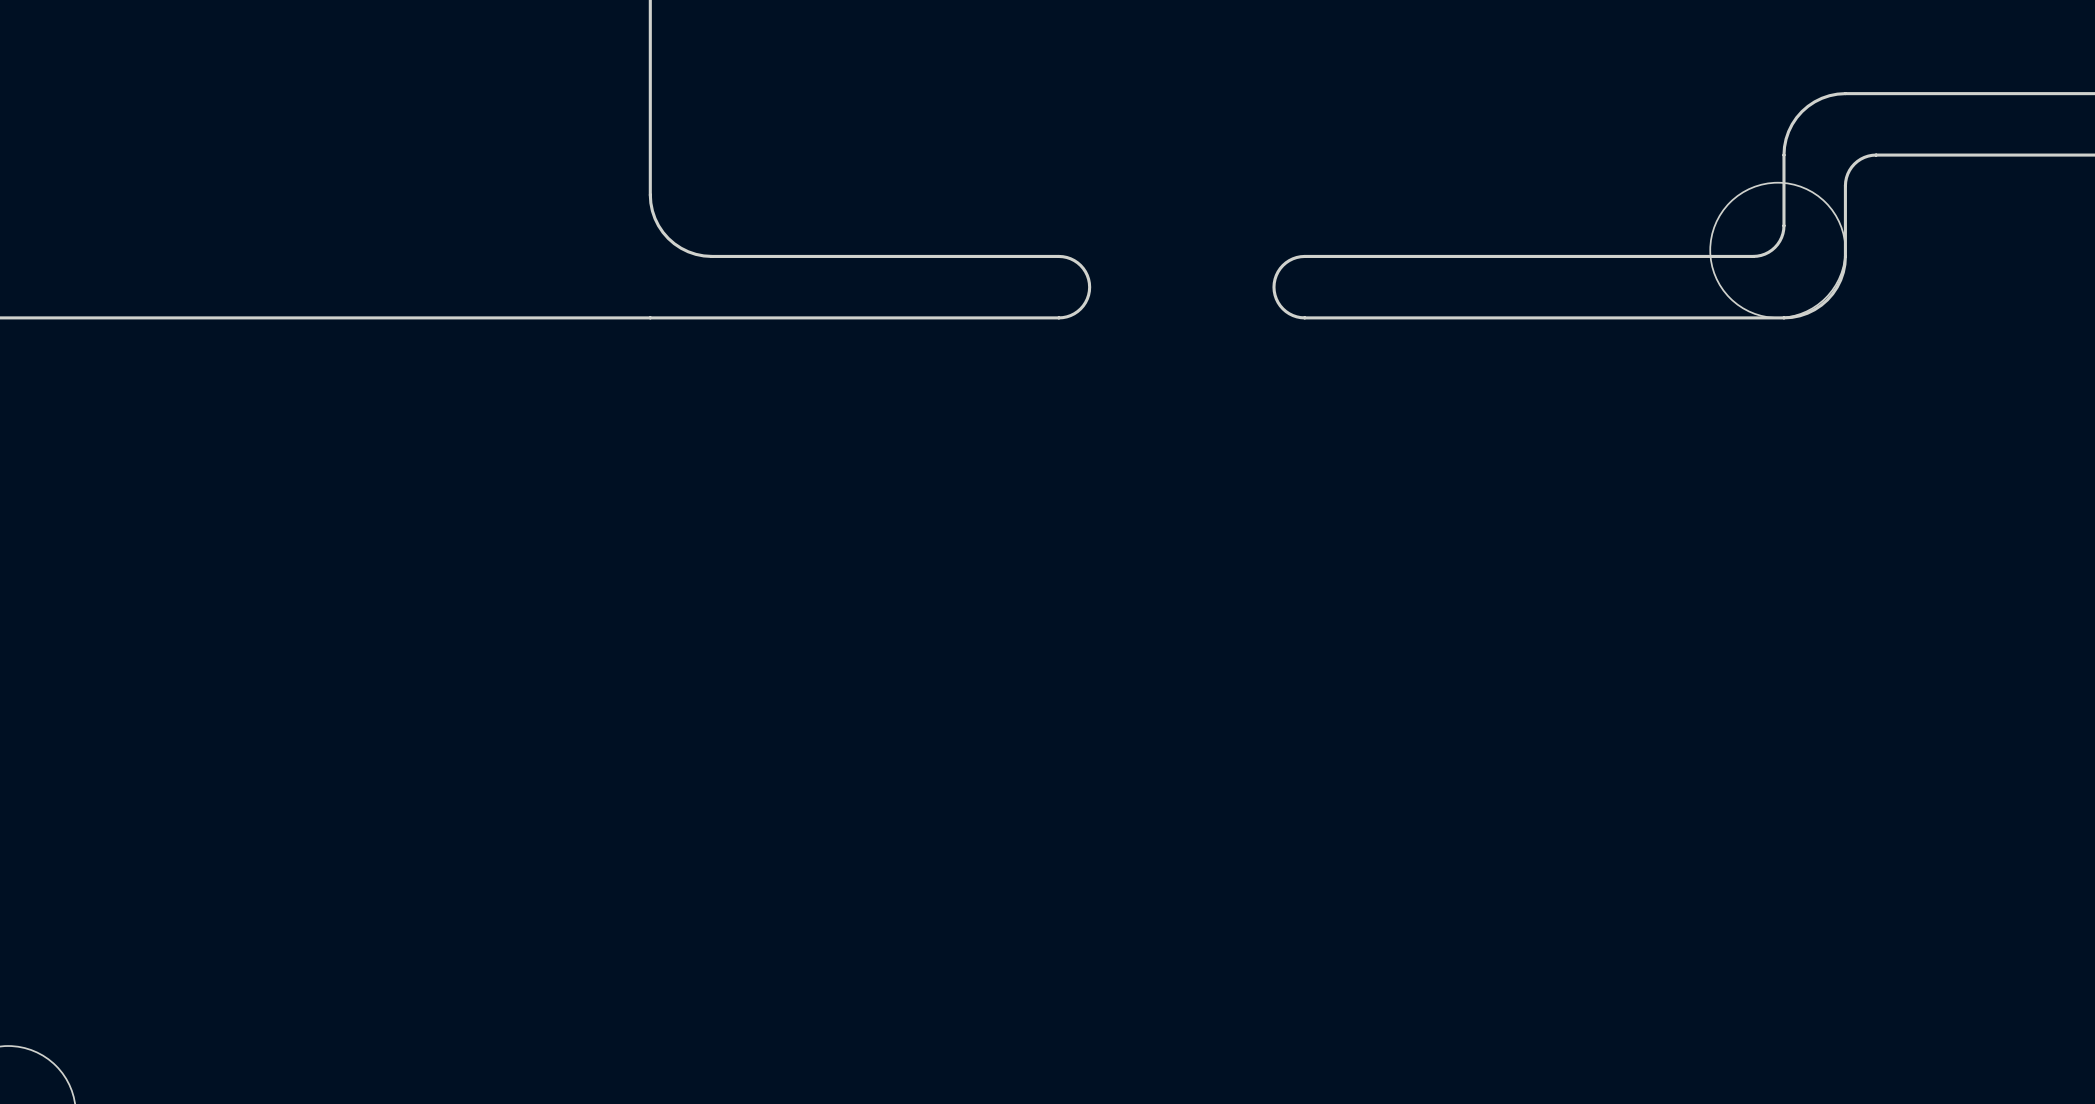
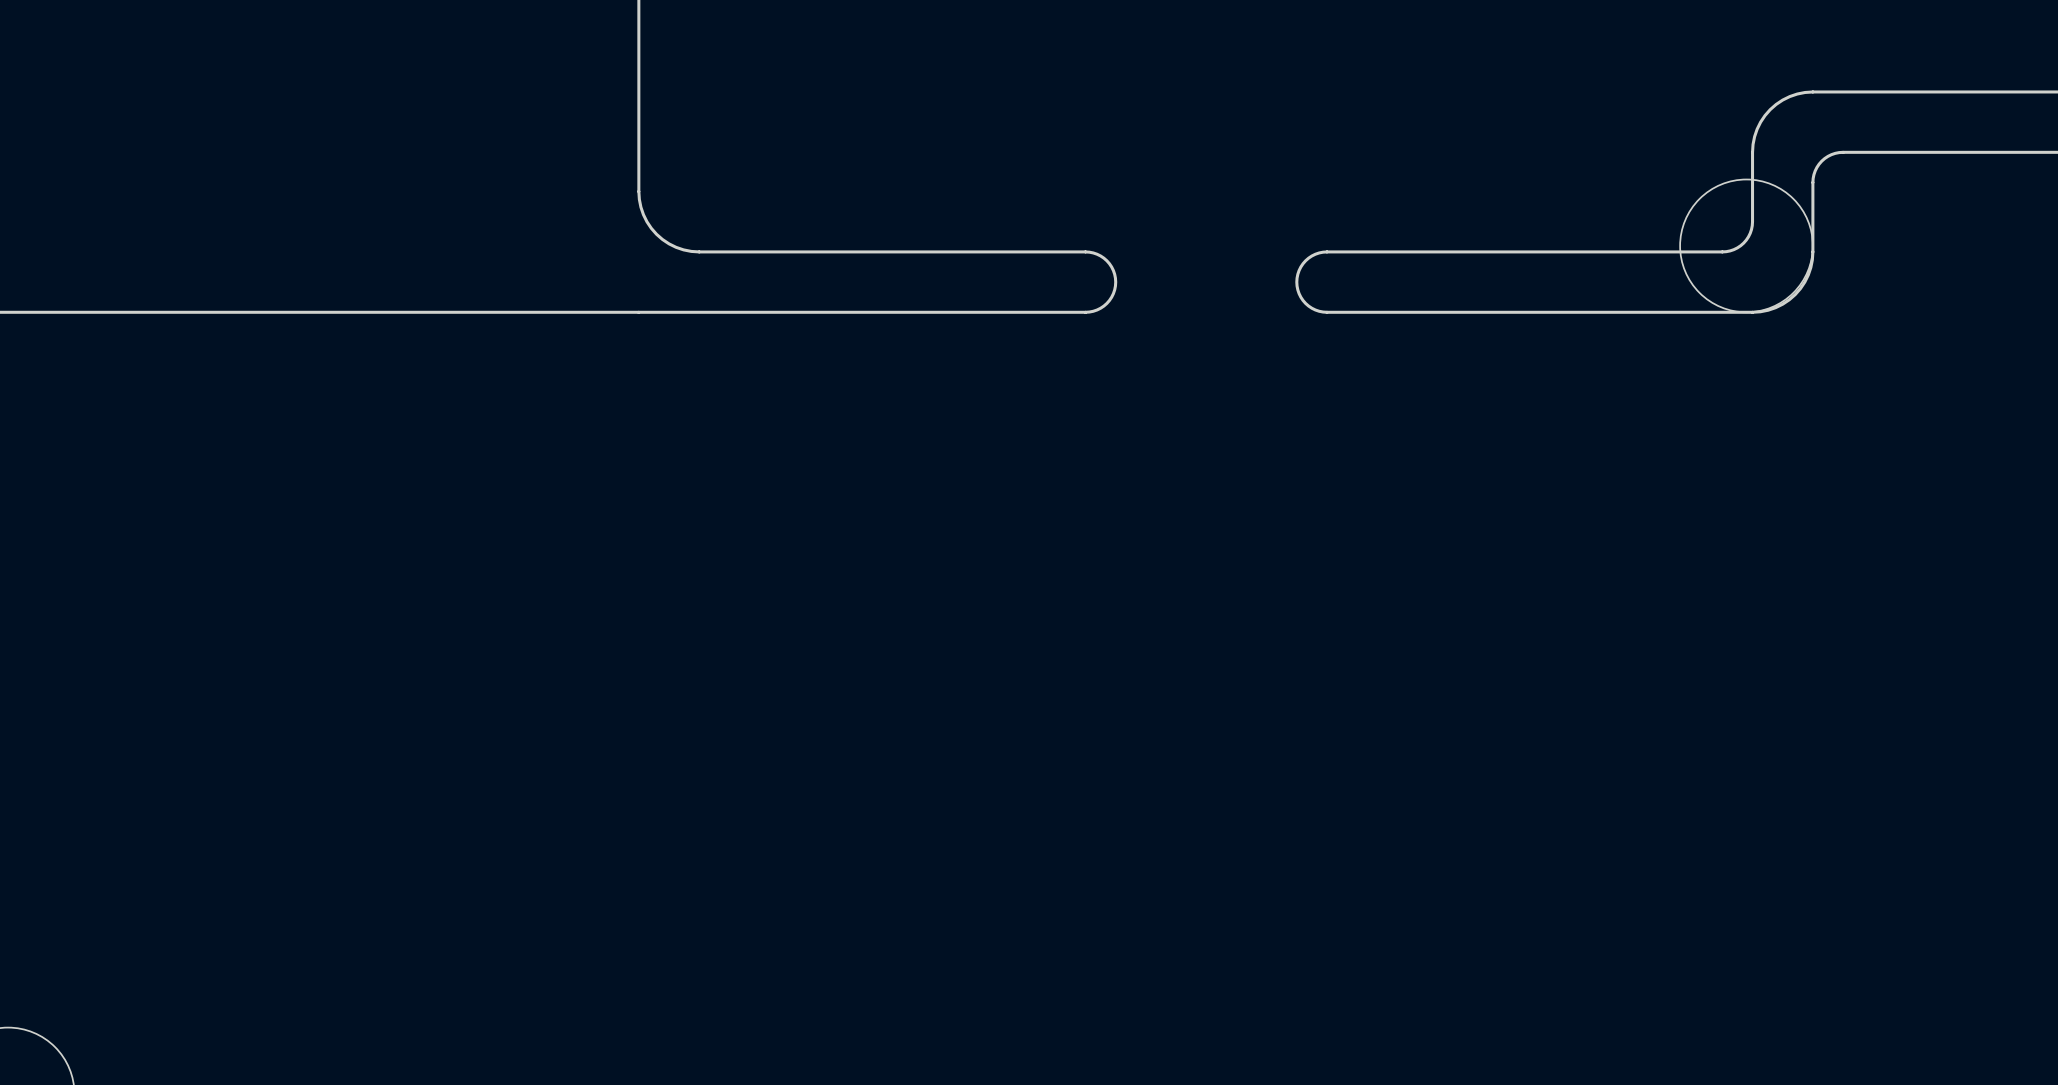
board edge: (1058, 256) (1070, 258) (1080, 265) (1087, 275) (1089, 287) (1087, 298) (1080, 308) (1070, 315) (1058, 317) -> (1040, 251) (1085, 251) (1097, 254) (1109, 263) (1114, 274) (1115, 282) (1114, 289) (1109, 300) (1097, 309) (1085, 312) (1040, 312)
board edge: (1350, 256) (1304, 256) (1292, 258) (1280, 268) (1276, 275) (1273, 287) (1276, 298) (1280, 305) (1292, 315) (1304, 317) (1350, 317) -> (1326, 251) (1315, 254) (1305, 260) (1299, 270) (1296, 282) (1299, 293) (1305, 303) (1315, 309) (1326, 312)

